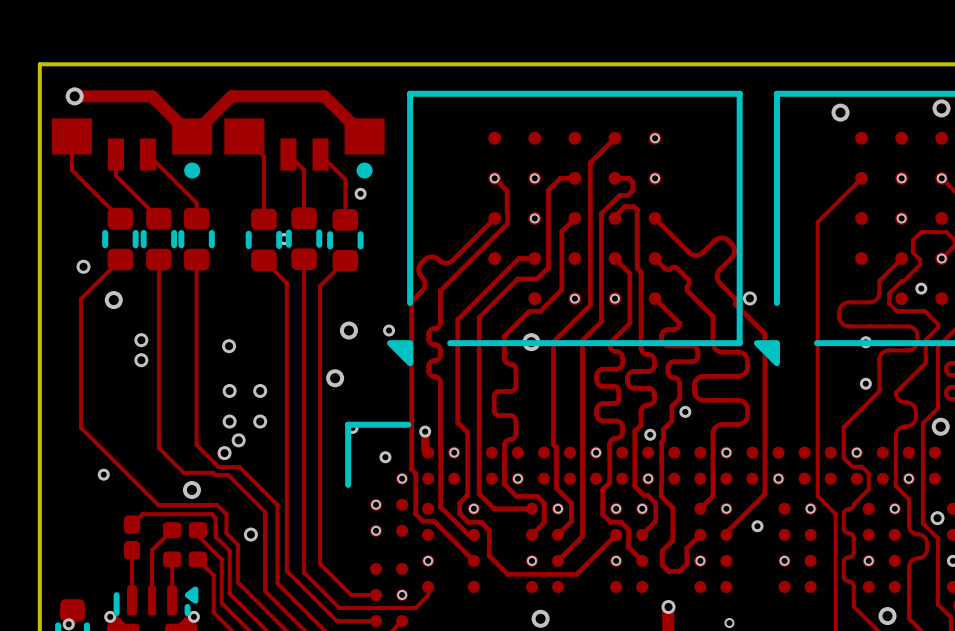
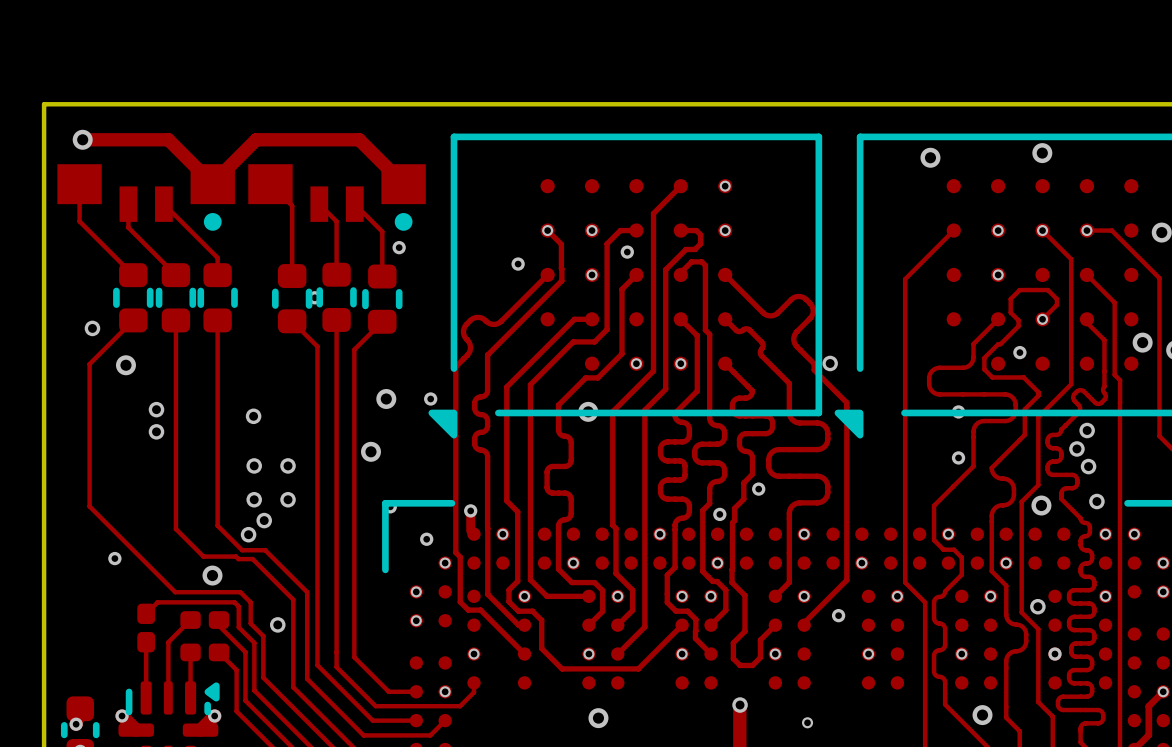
via: none -> (627, 252)
via: none -> (518, 264)

